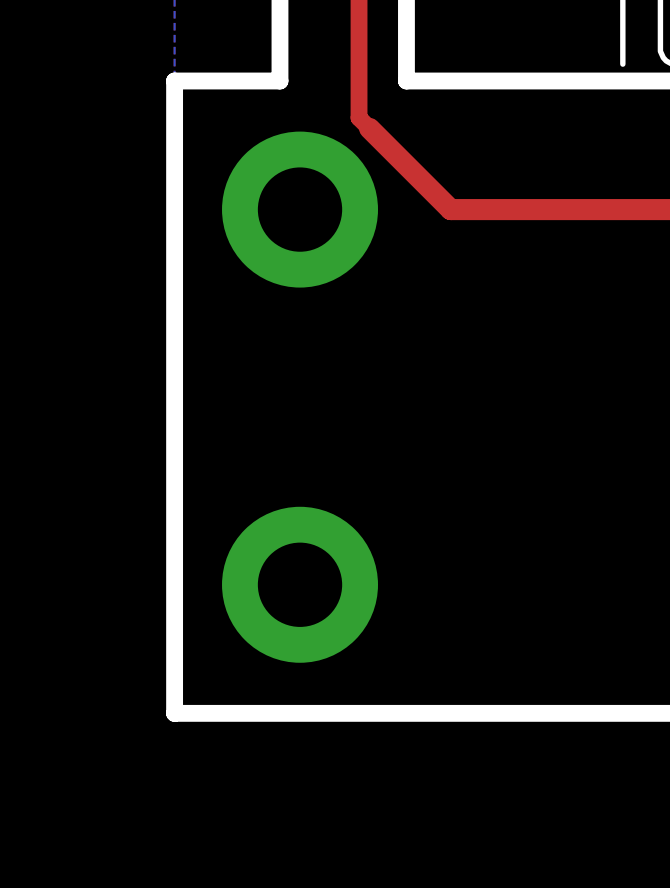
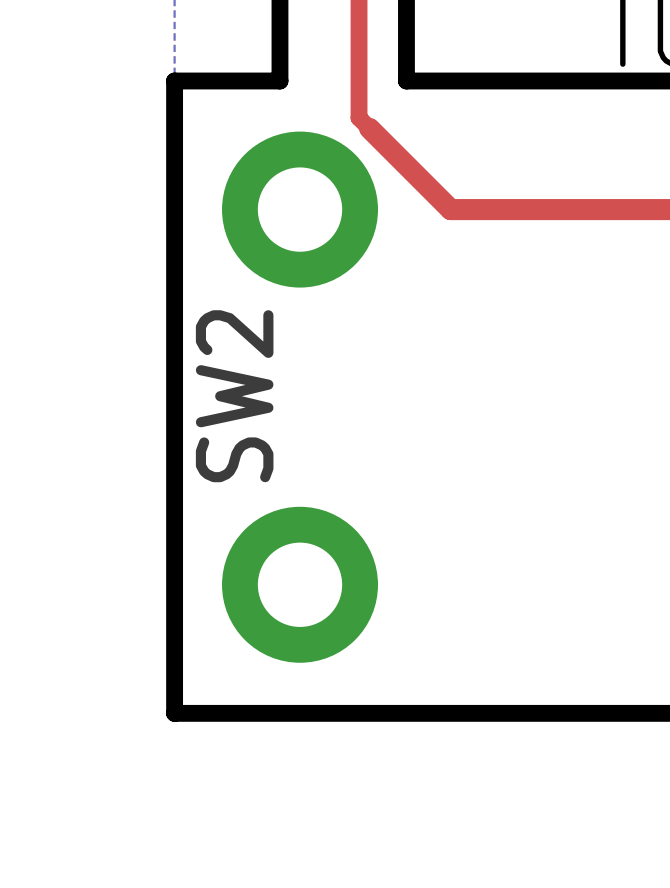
text: none -> SW2 (234, 396)

